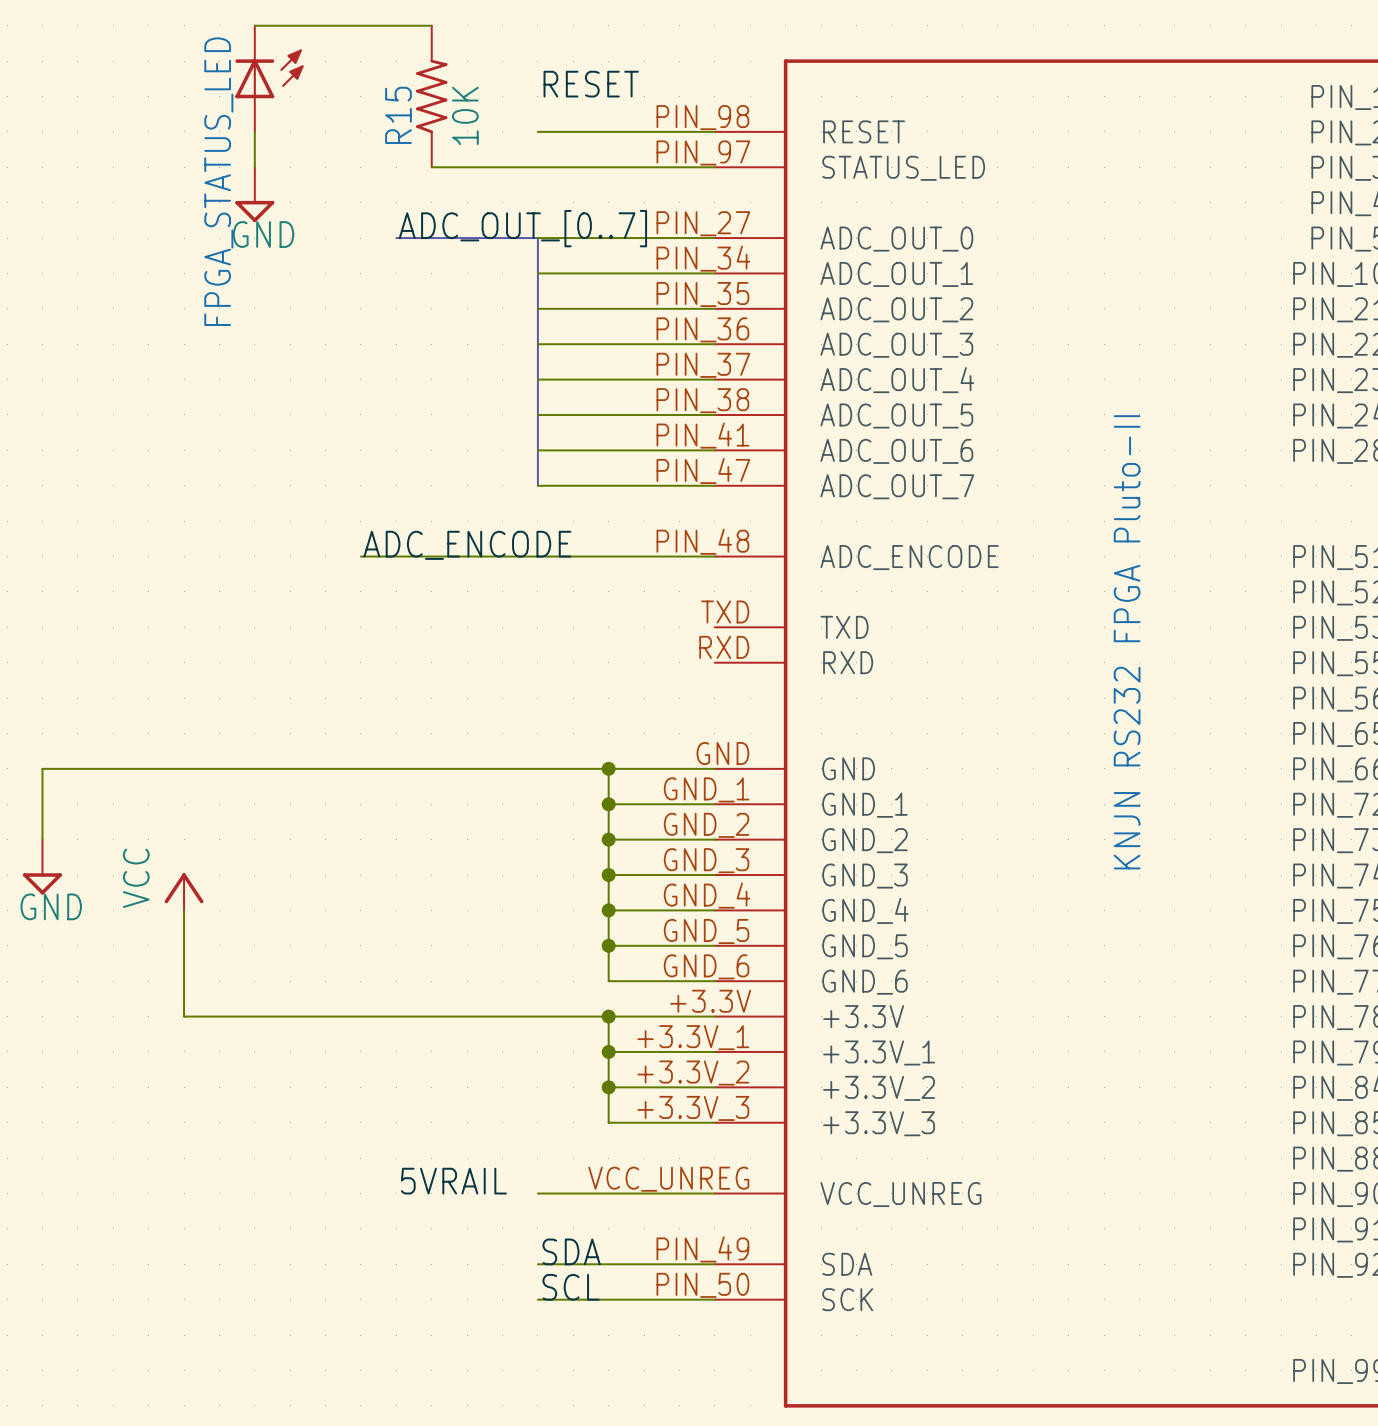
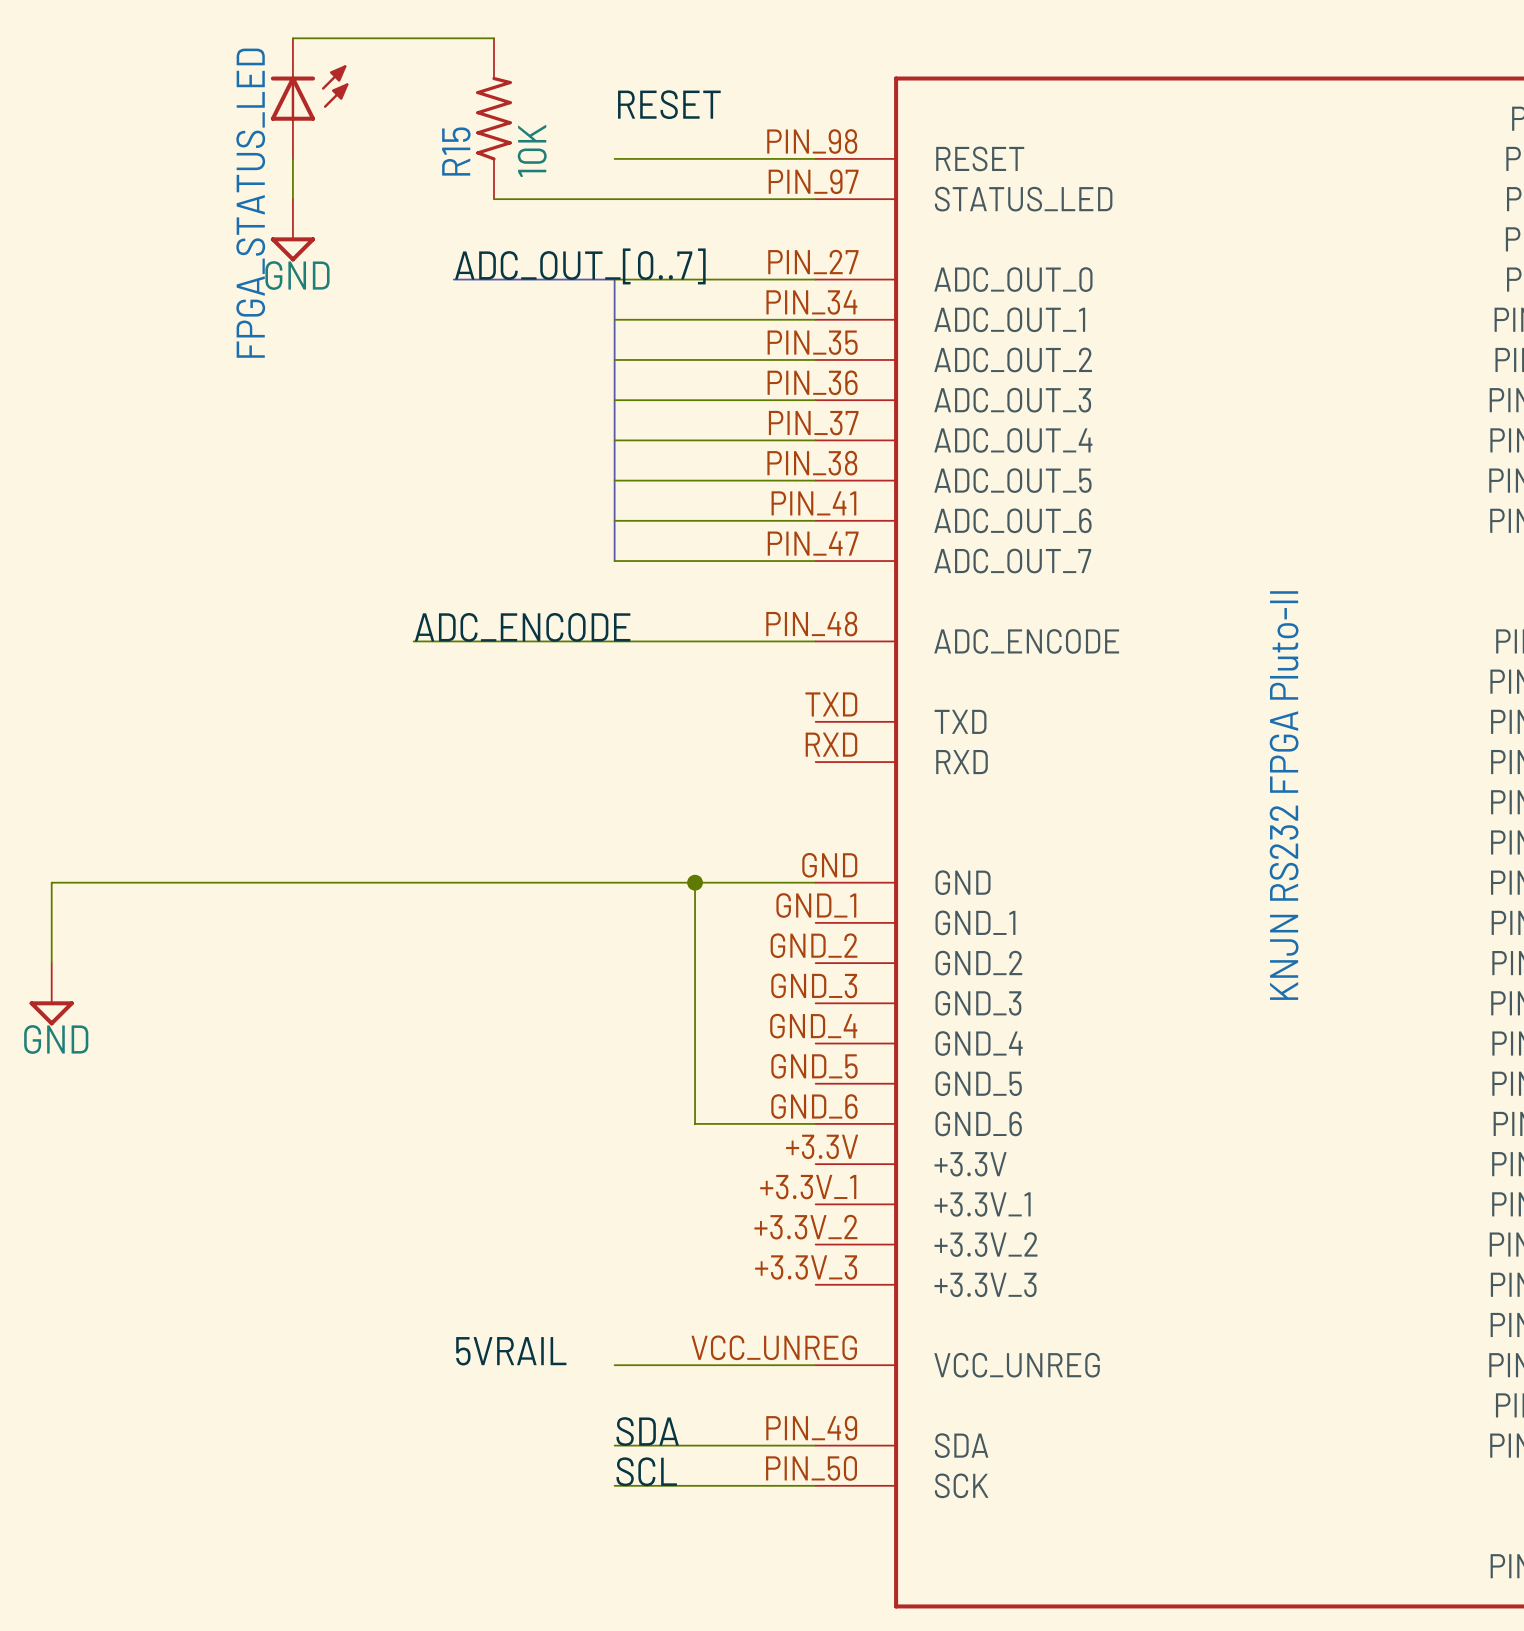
wire: (608, 804) (714, 804) -> none
junction: (608, 804) -> none
wire: (608, 839) (714, 839) -> none
junction: (608, 839) -> none
wire: (608, 875) (714, 875) -> none
junction: (608, 875) -> none
power symbol: VCC (184, 891) -> none
wire: (184, 910) (184, 1016) (714, 1016) -> none
wire: (608, 910) (714, 910) -> none
junction: (608, 910) -> none
wire: (608, 945) (714, 945) -> none
junction: (608, 945) -> none
wire: (608, 1016) (608, 1122) (714, 1122) -> none
junction: (608, 1016) -> none
wire: (608, 1051) (714, 1051) -> none
junction: (608, 1051) -> none
wire: (608, 1087) (714, 1087) -> none
junction: (608, 1087) -> none

